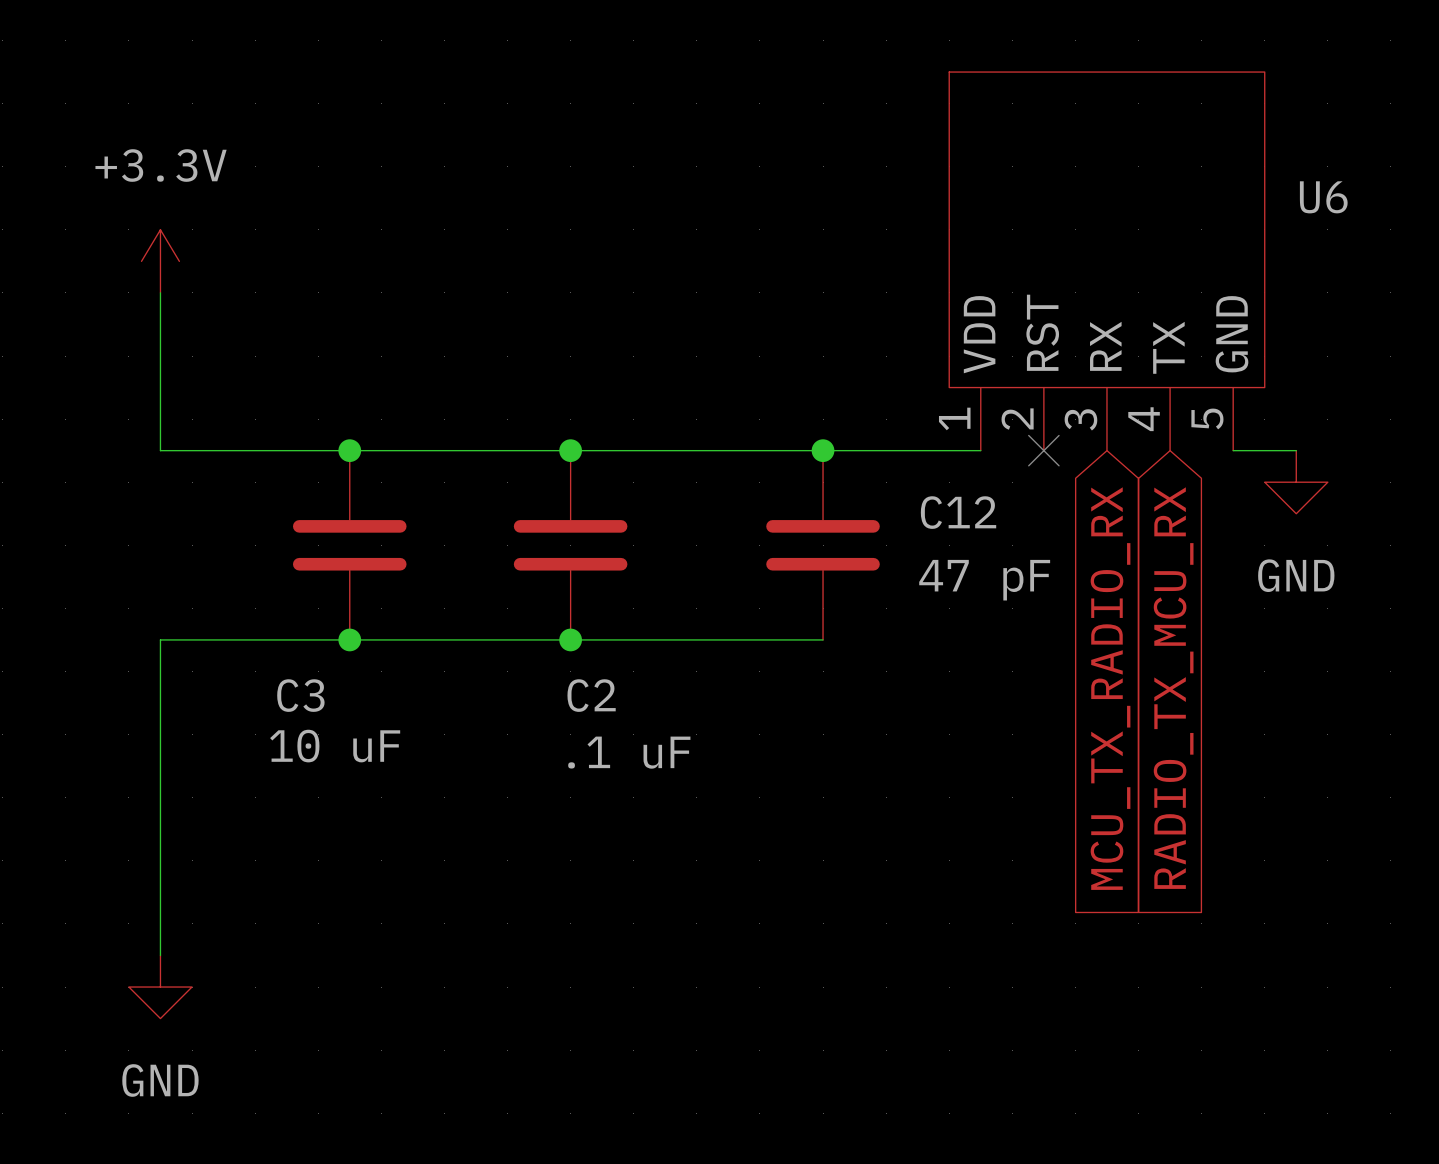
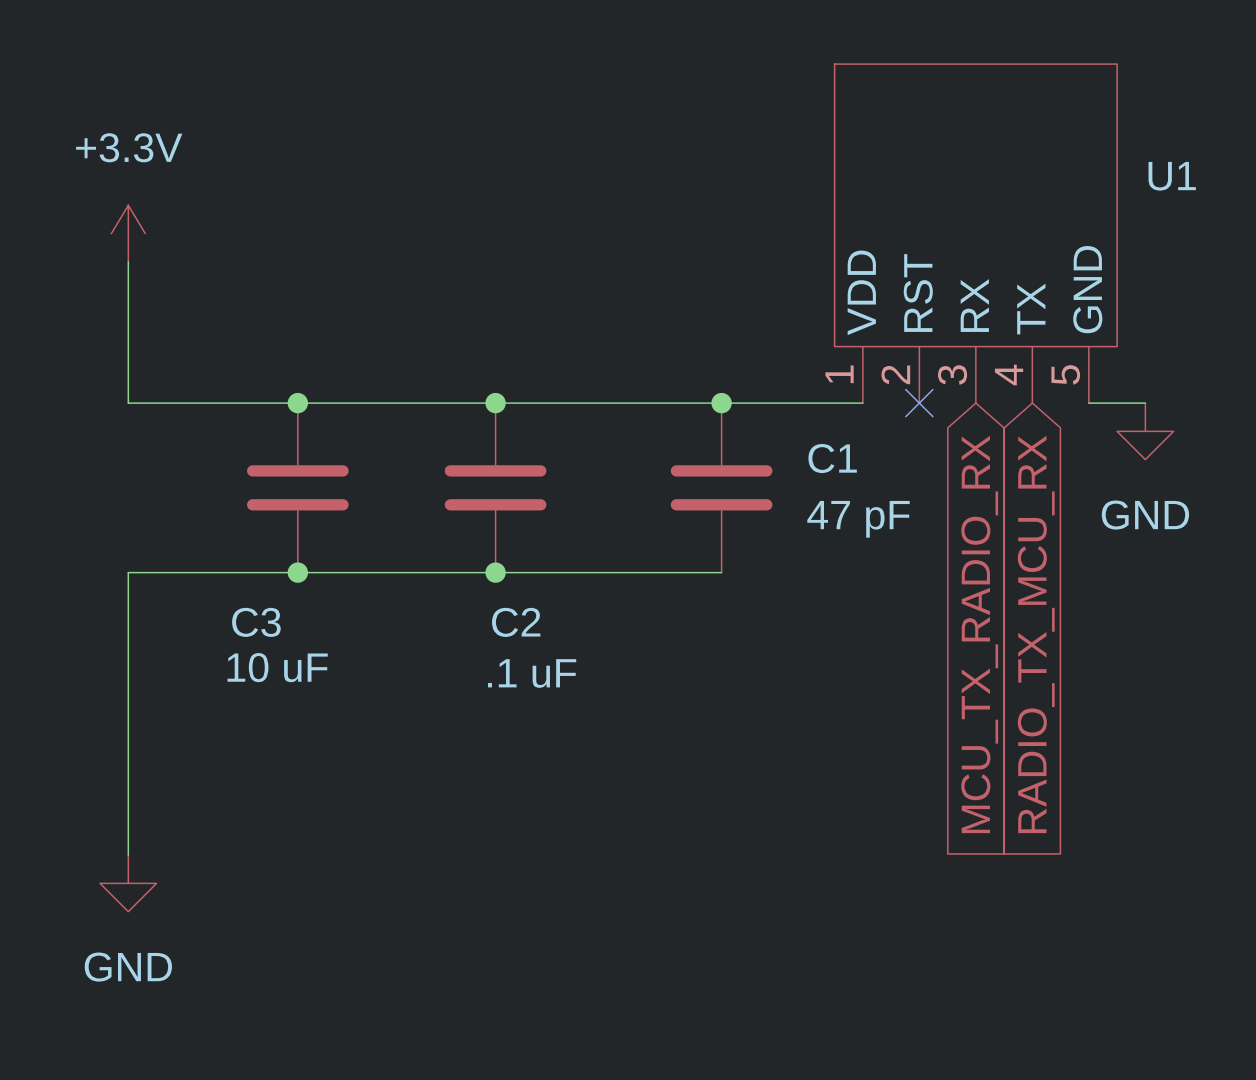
U6 name: U6 (1323, 197) -> U1 (1172, 176)
C12 name: C12 (958, 512) -> C1 (832, 458)

